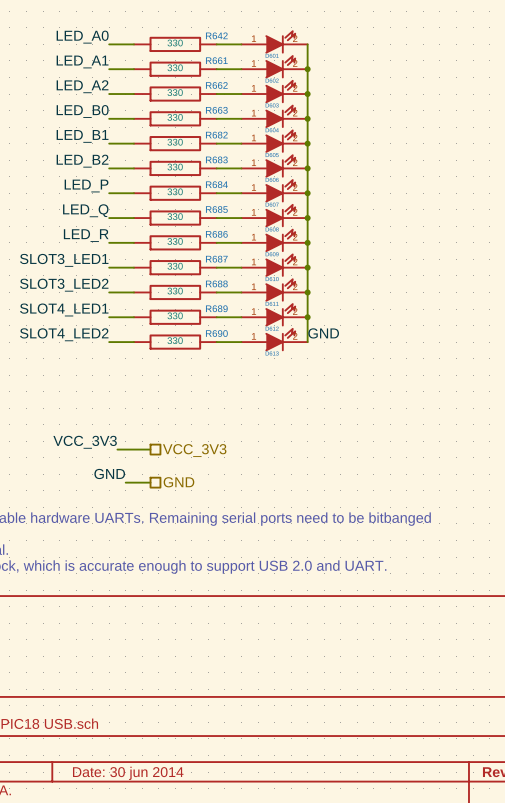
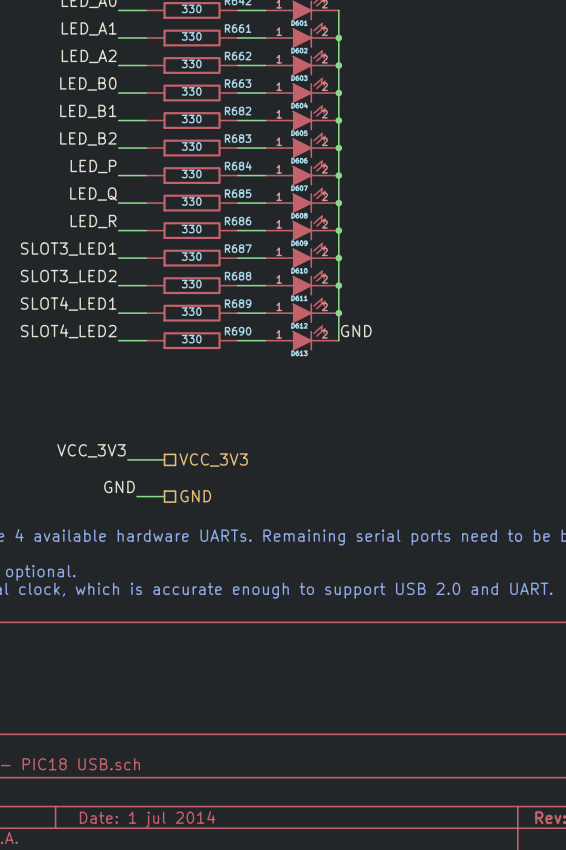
title block: Date: 30 jun 2014 (128, 773) -> Date: 1 jul 2014 (147, 819)

